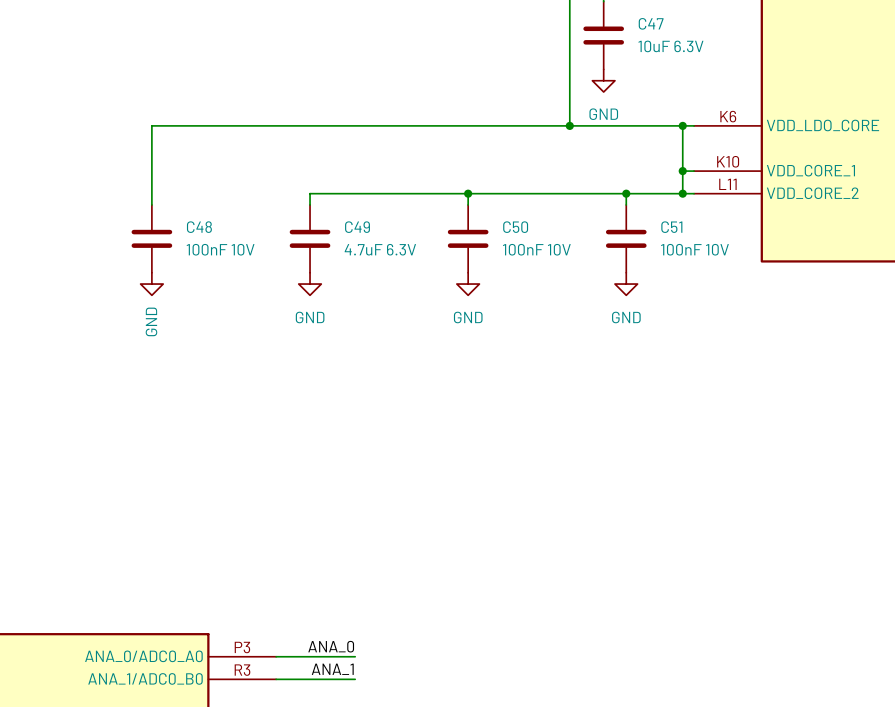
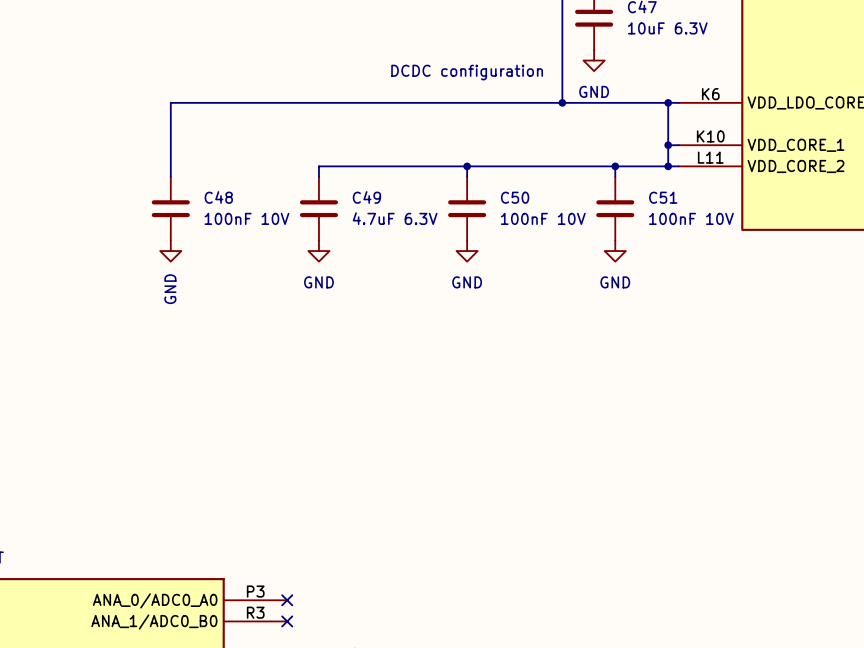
text: none -> DCDC configuration (467, 72)
label: ANA_0 (331, 646) -> none
wire: (276, 656) (355, 656) -> none
no-connect mark: none -> (287, 600)
label: ANA_1 (332, 669) -> none
wire: (276, 679) (355, 679) -> none
no-connect mark: none -> (287, 621)

